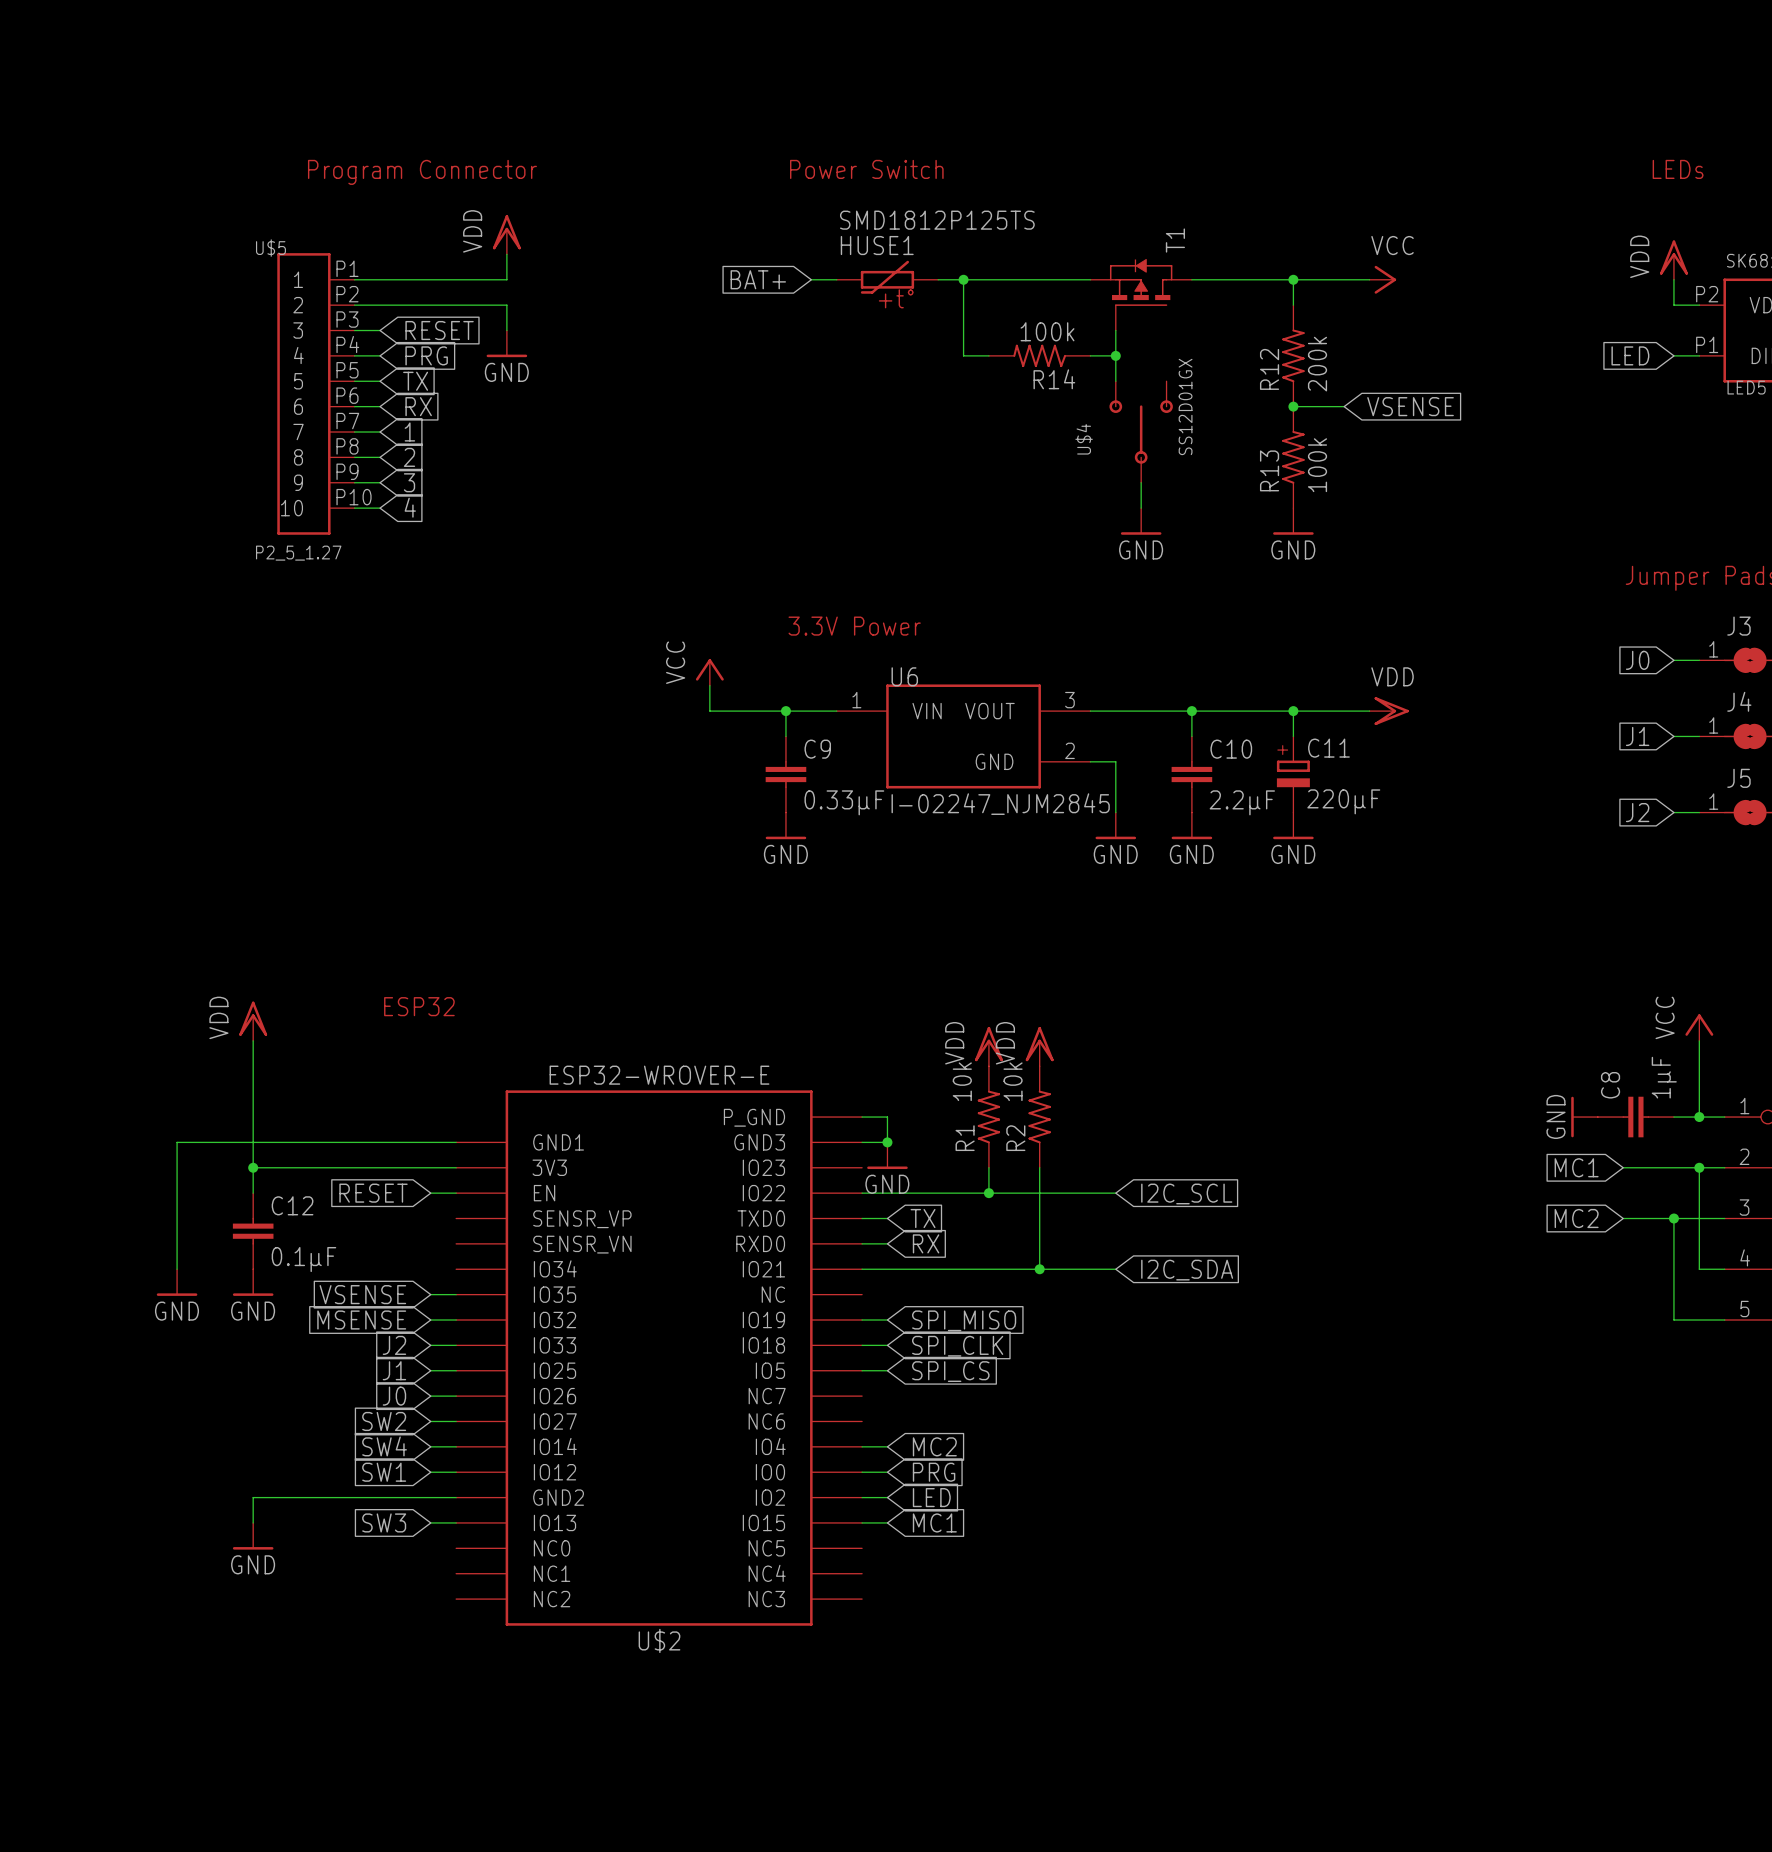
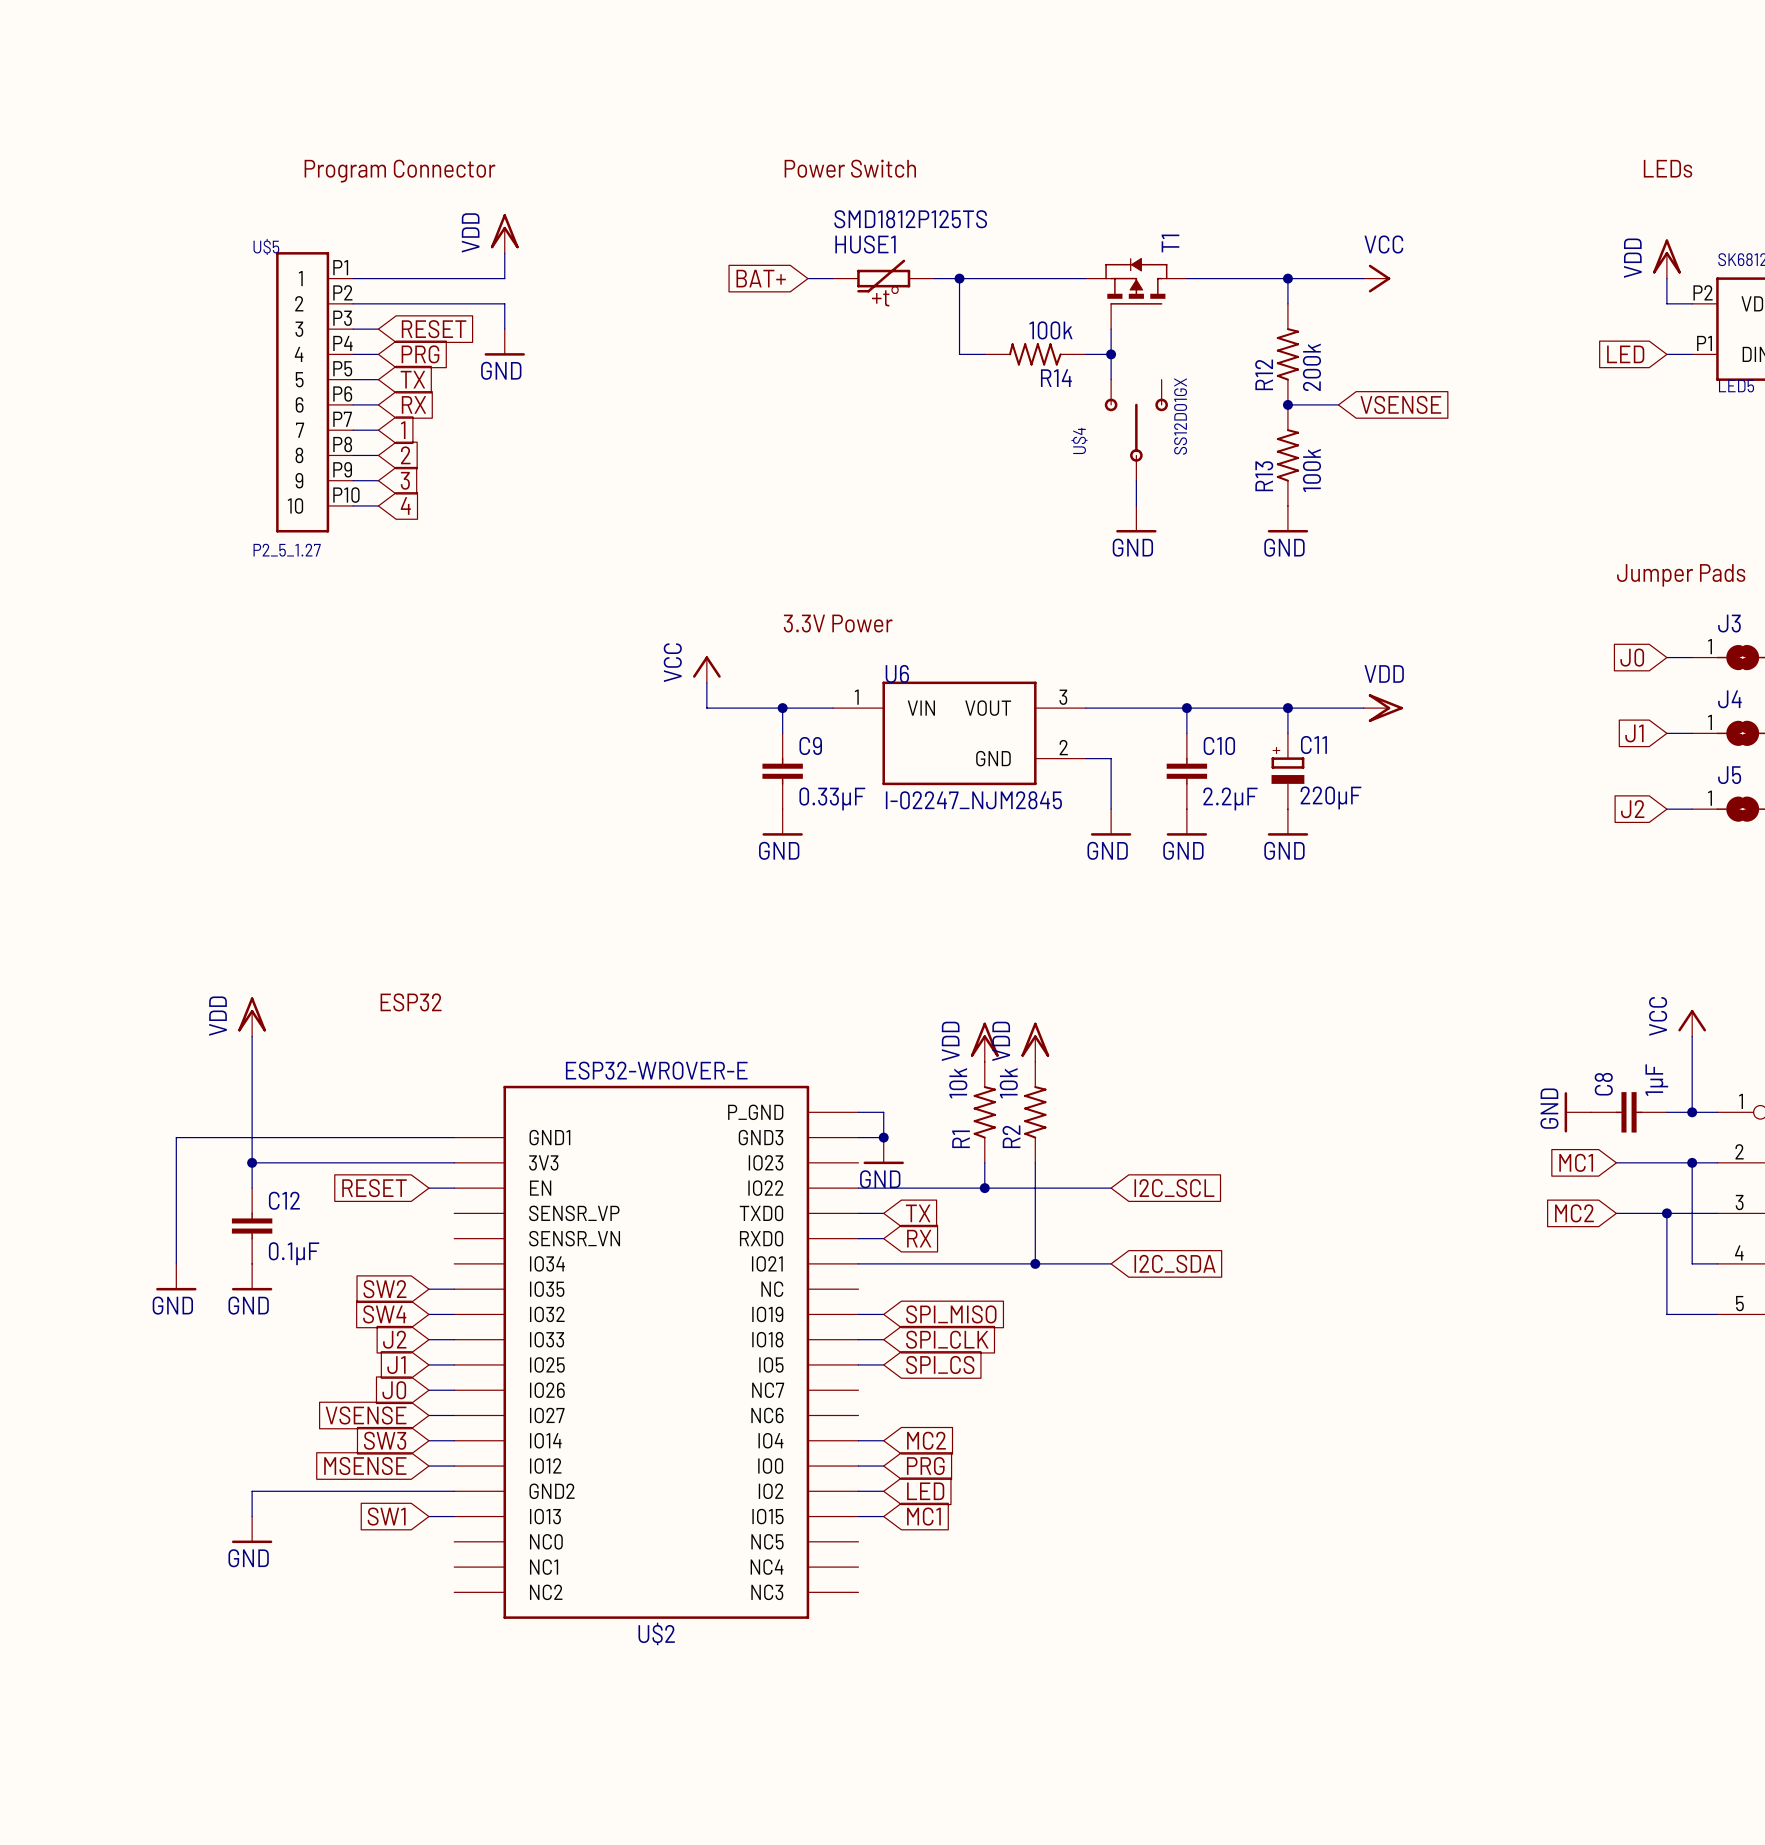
global label: VSENSE (362, 1294) -> SW2 (384, 1289)
global label: MSENSE (361, 1319) -> SW4 (384, 1314)
global label: SW2 (384, 1421) -> VSENSE (366, 1415)
global label: SW4 (384, 1446) -> SW3 (385, 1440)
global label: SW1 (384, 1472) -> MSENSE (365, 1466)
global label: SW3 (384, 1522) -> SW1 (386, 1516)

